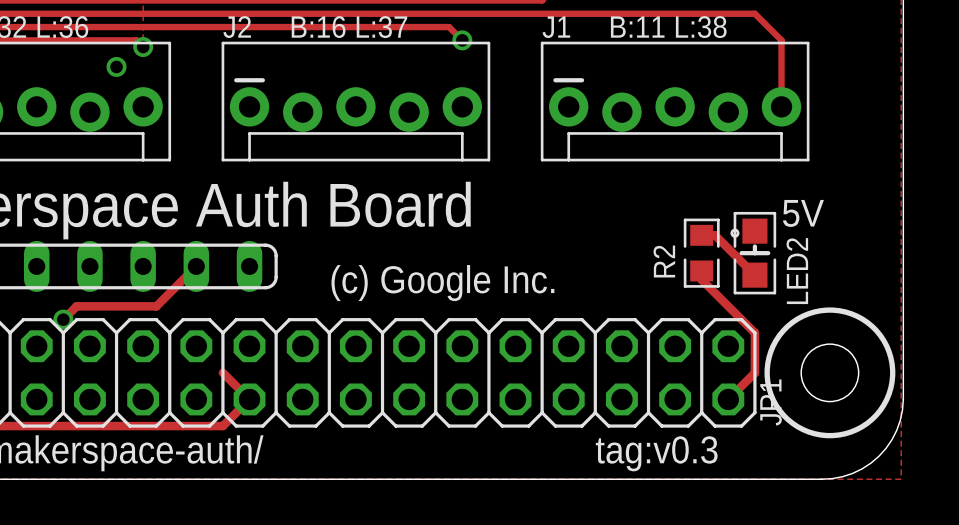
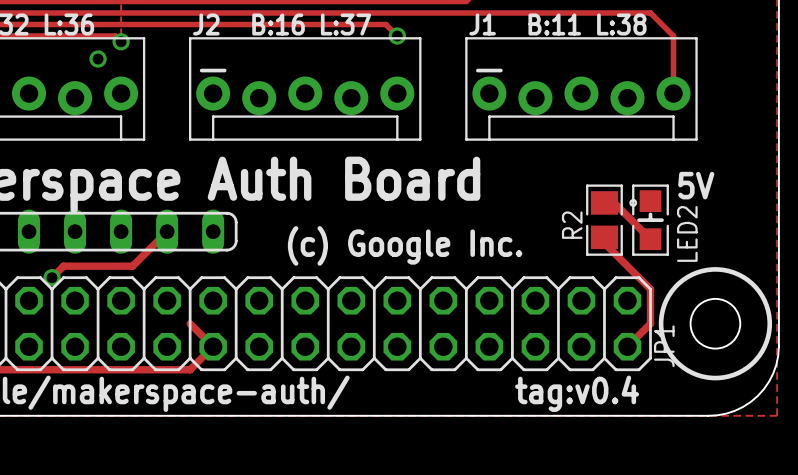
R2 footprint: [683, 218, 720, 288] -> [586, 184, 623, 256]
text: tag:v0.3 (656, 453) -> tag:v0.4 (577, 393)

